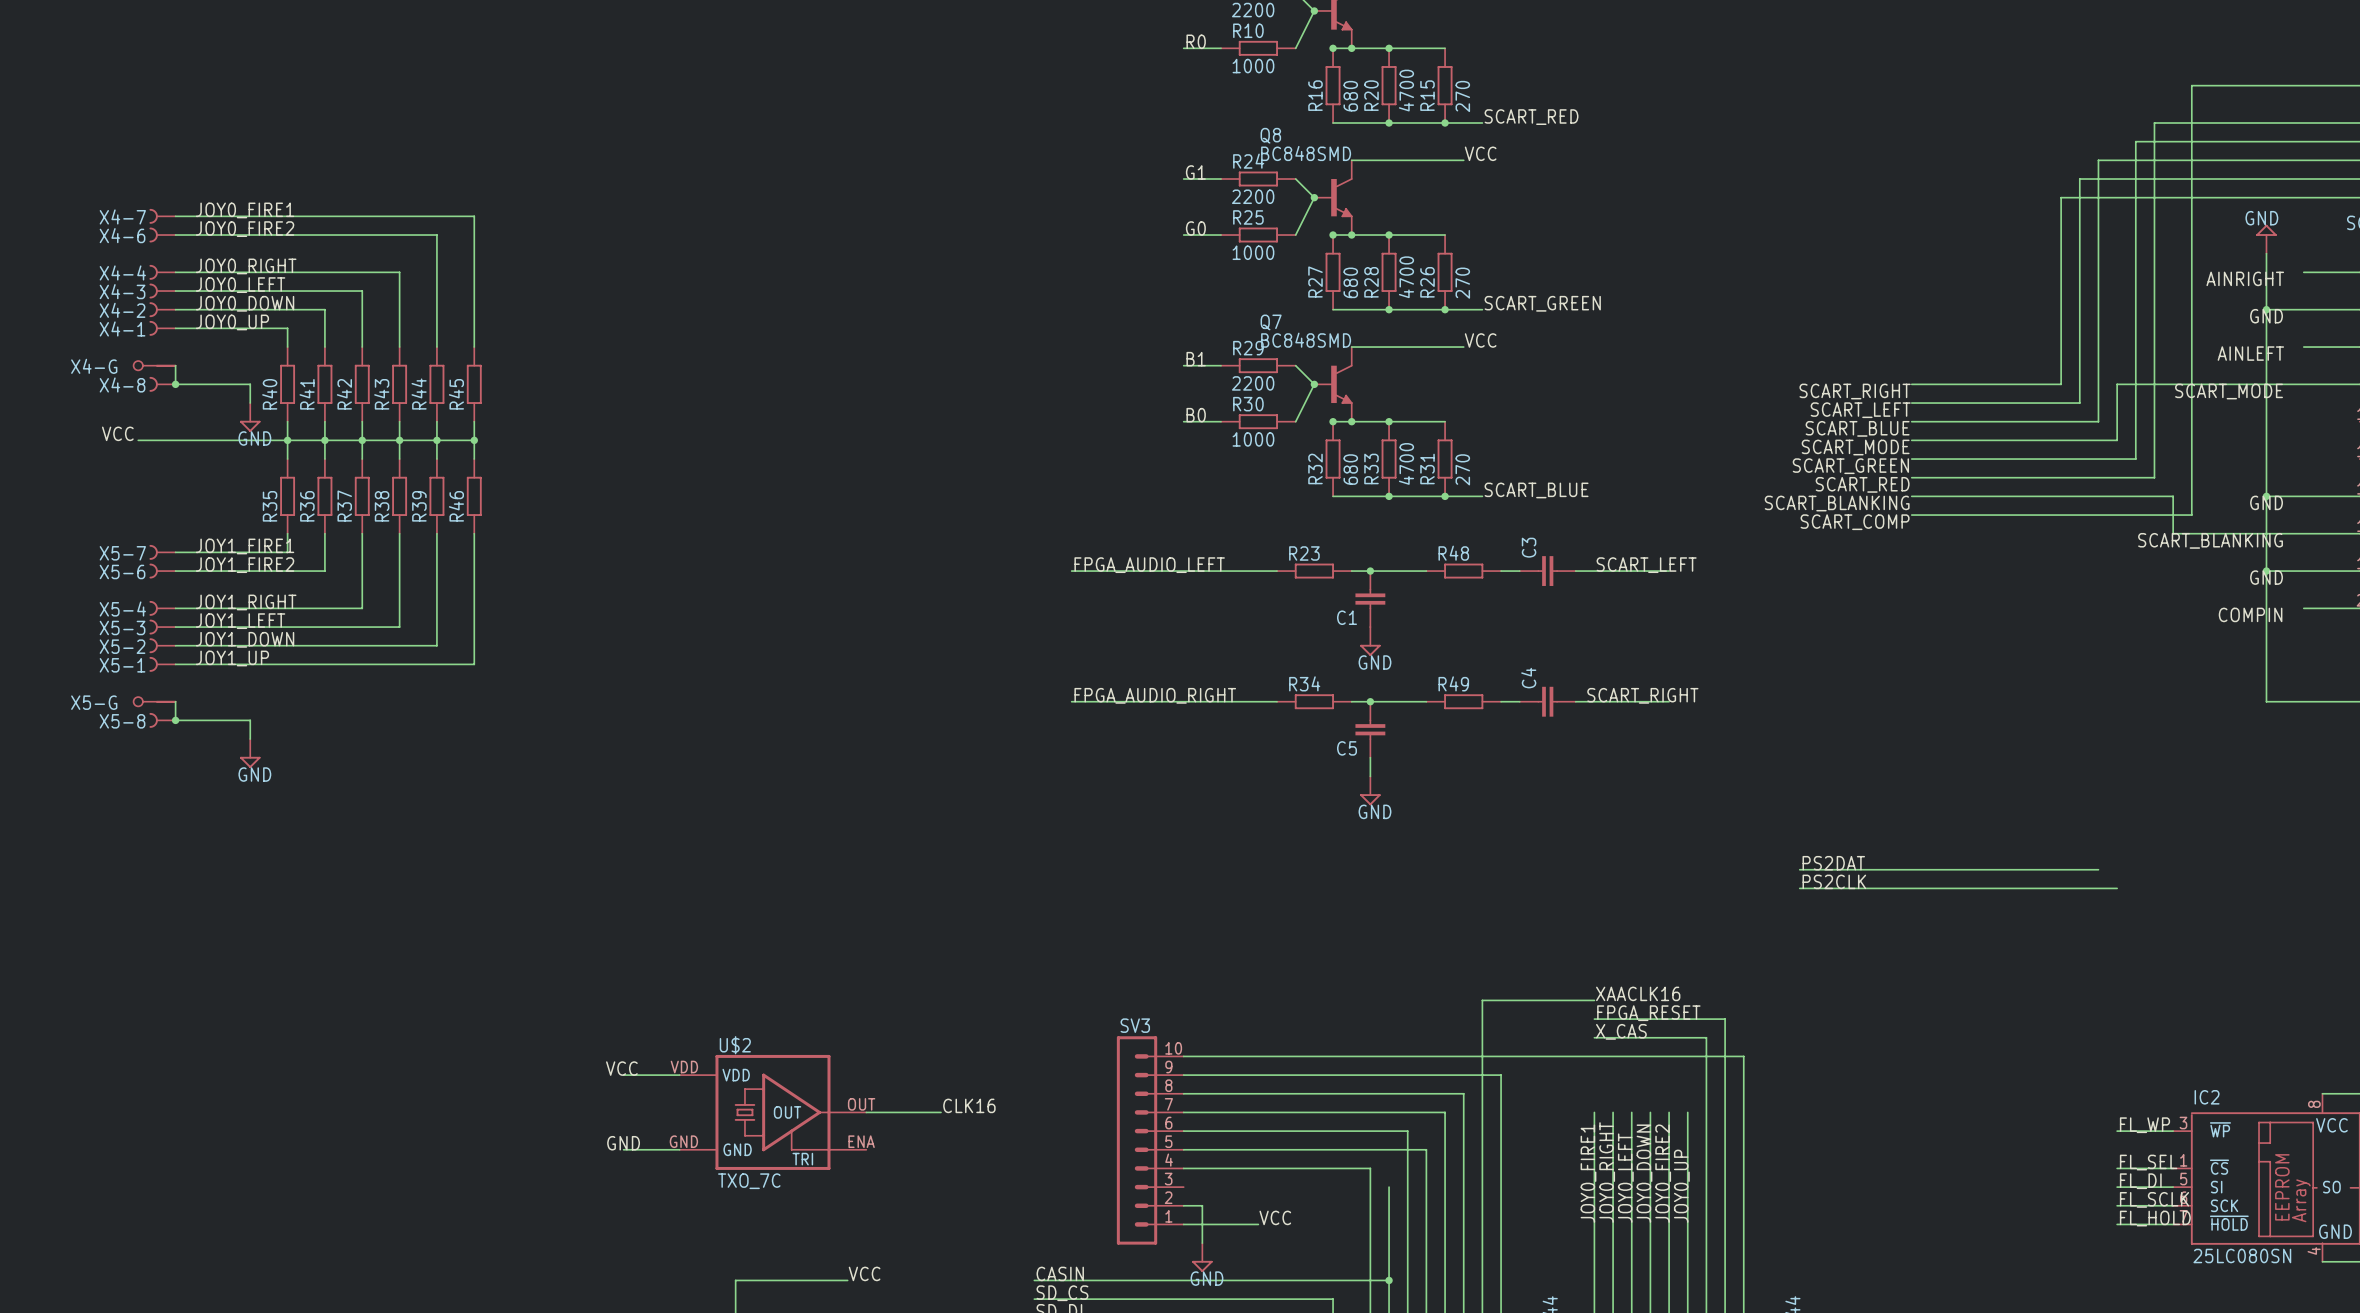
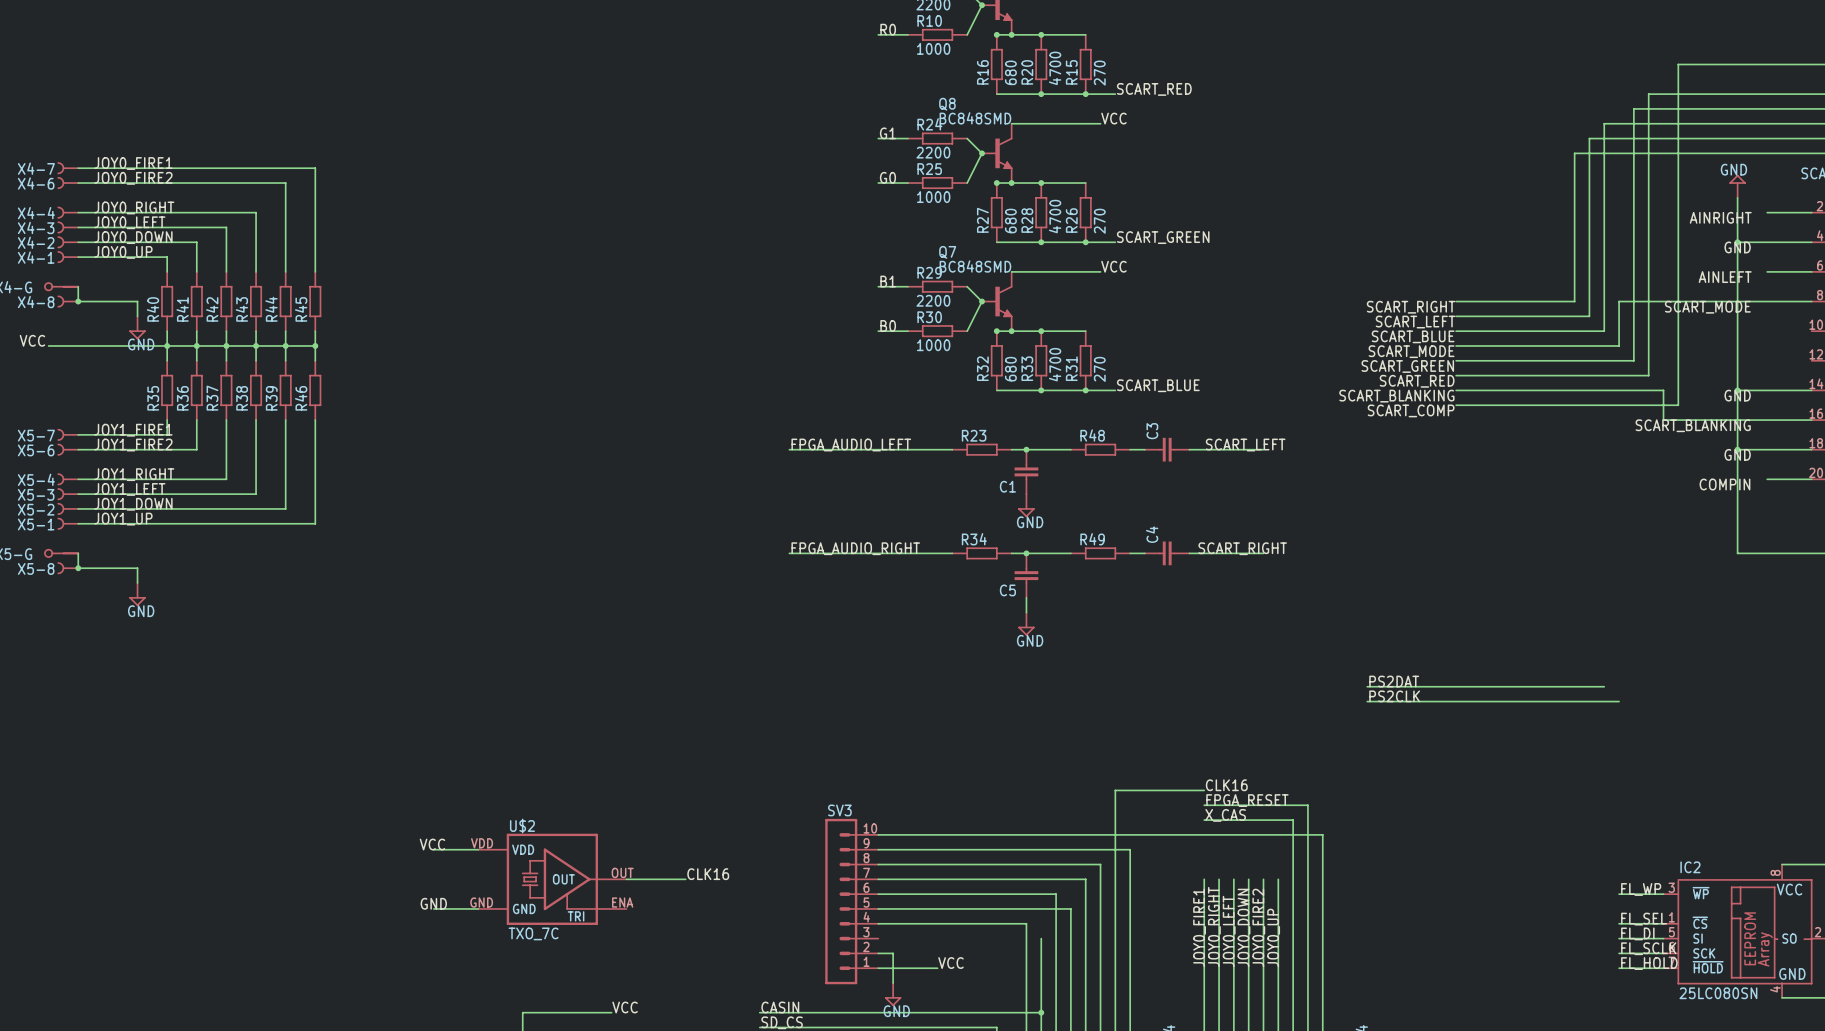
label: XAACLK16 (1638, 993) -> CLK16 (1226, 785)

